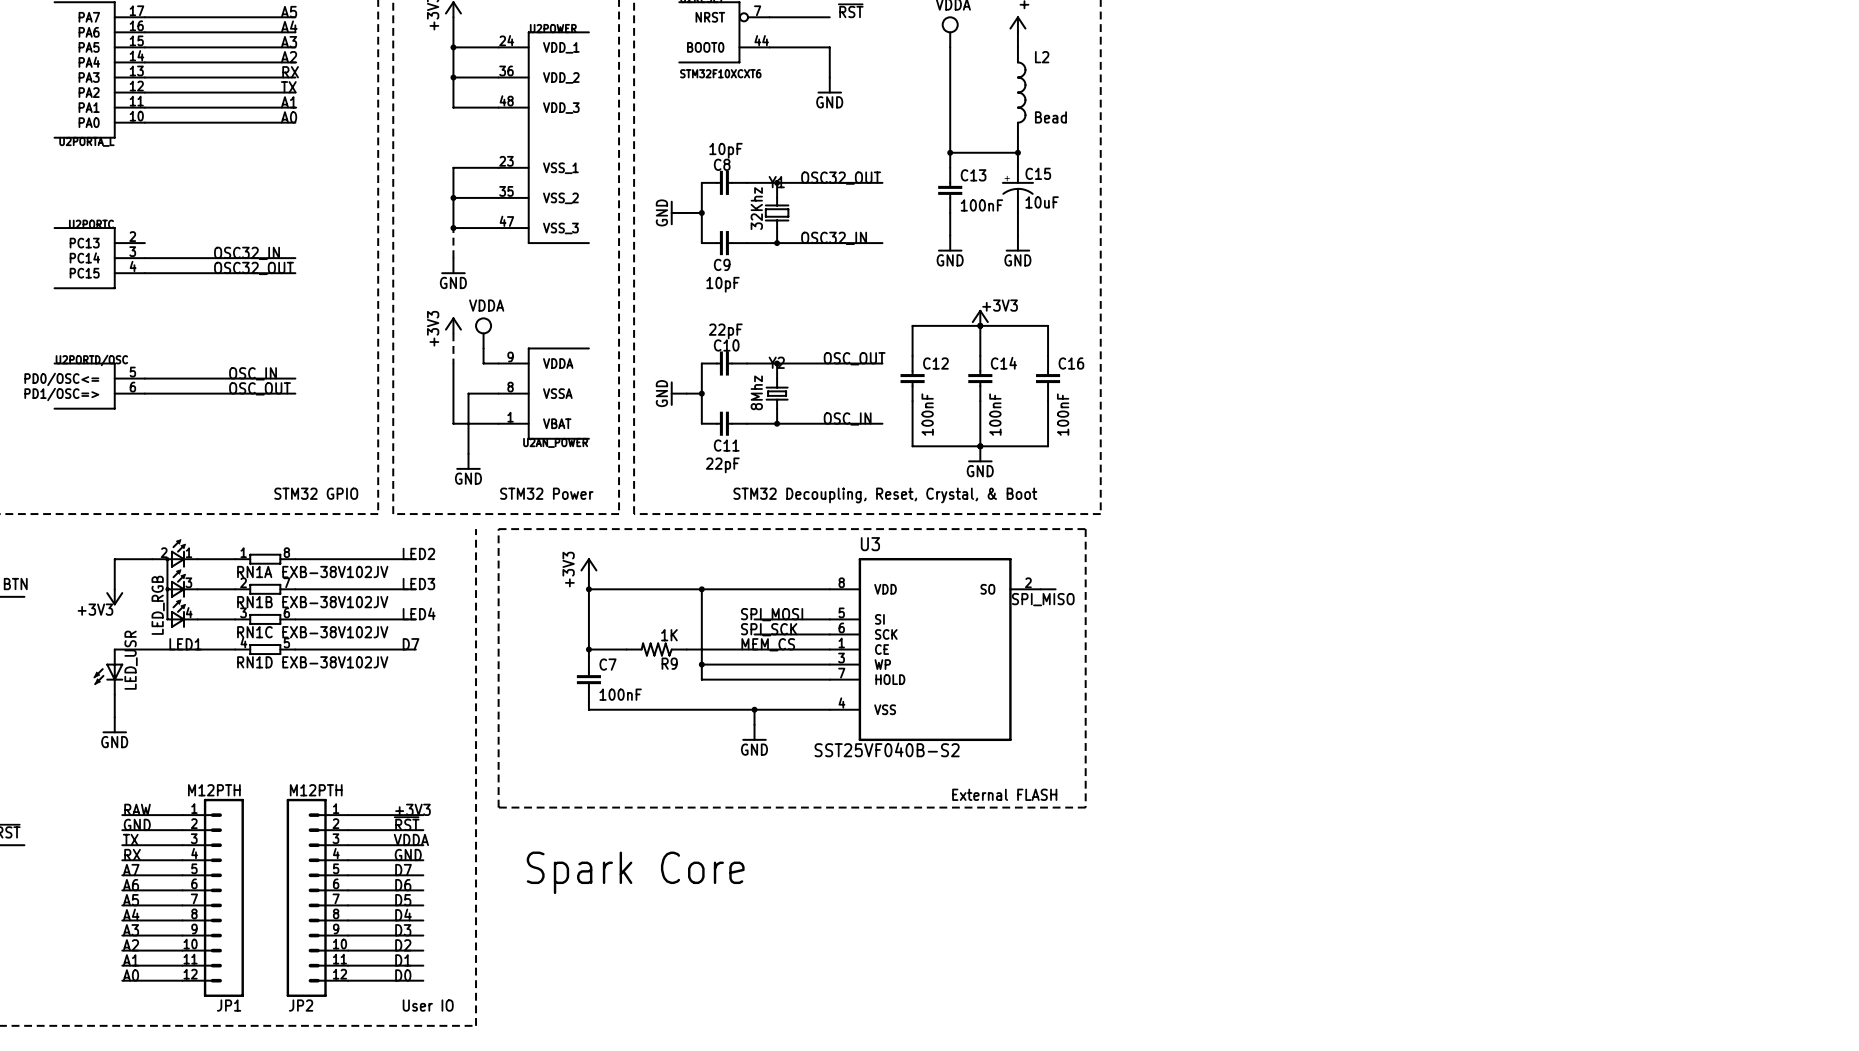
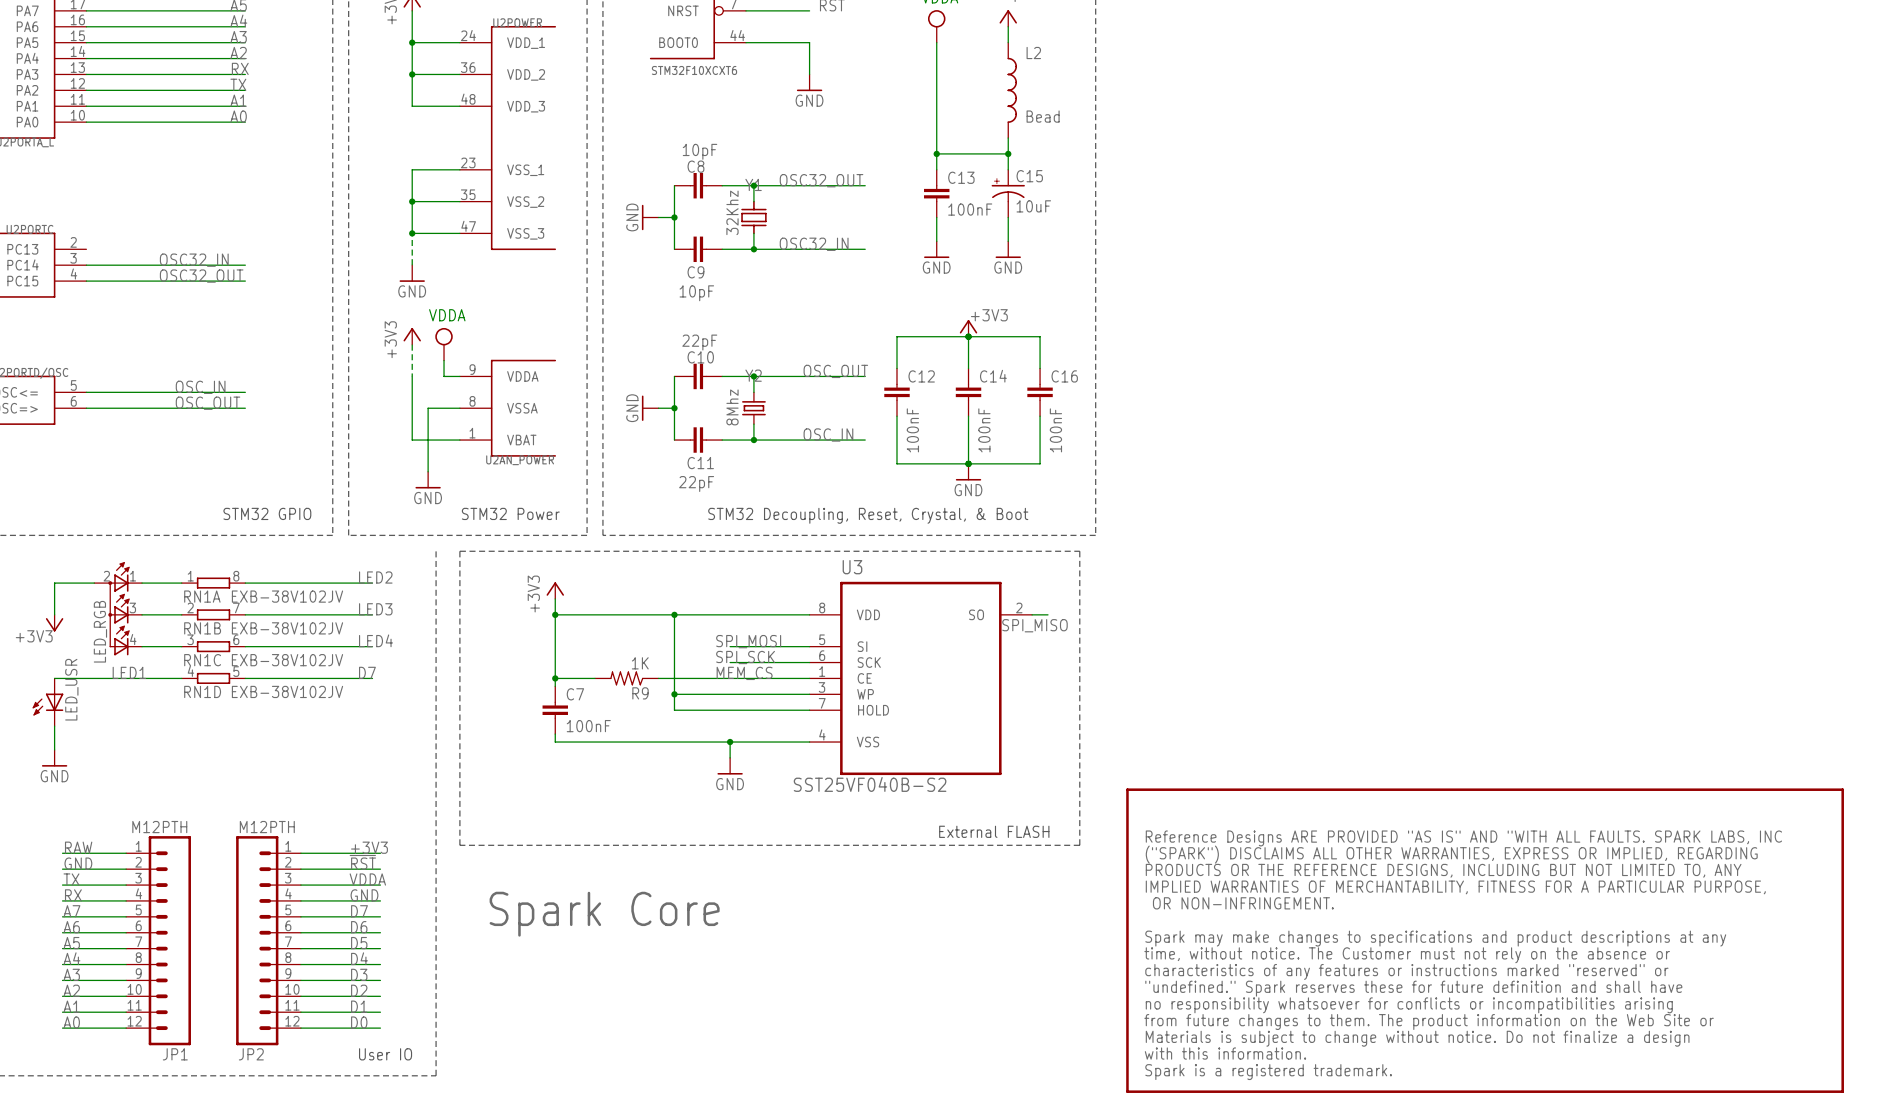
line: none -> (1127, 789) (1127, 1091) (1842, 1091) (1842, 789) (1127, 789)
text: none -> Reference Designs ARE PROVIDED "AS IS" AND "WITH ALL FAULTS. SPARK LABS, INC (1463, 838)
text: none -> ("SPARK") DISCLAIMS ALL OTHER WARRANTIES, EXPRESS OR IMPLIED, REGARDING (1451, 854)
text: none -> PRODUCTS OR THE REFERENCE DESIGNS, INCLUDING BUT NOT LIMITED TO, ANY (1443, 870)
text: none -> IMPLIED WARRANTIES OF MERCHANTABILITY, FITNESS FOR A PARTICULAR PURPOSE, (1455, 887)
text: none -> OR NON-INFRINGEMENT. (1243, 903)
text: none -> Spark may make changes to specifications and product descriptions at any (1435, 938)
text: none -> time, without notice. The Customer must not rely on the absence or (1407, 955)
text: none -> characteristics of any features or instructions marked "reserved" or (1406, 971)
text: none -> "undefined." Spark reserves these for future definition and shall have (1413, 988)
text: none -> no responsibility whatsoever for conflicts or incompatibilities arising (1409, 1005)
text: none -> from future changes to them. The product information on the Web Site or (1429, 1022)
text: none -> Materials is subject to change without notice. Do not finalize a design (1417, 1038)
text: none -> with this information. (1225, 1053)
text: none -> Spark is a registered trademark. (1268, 1072)

